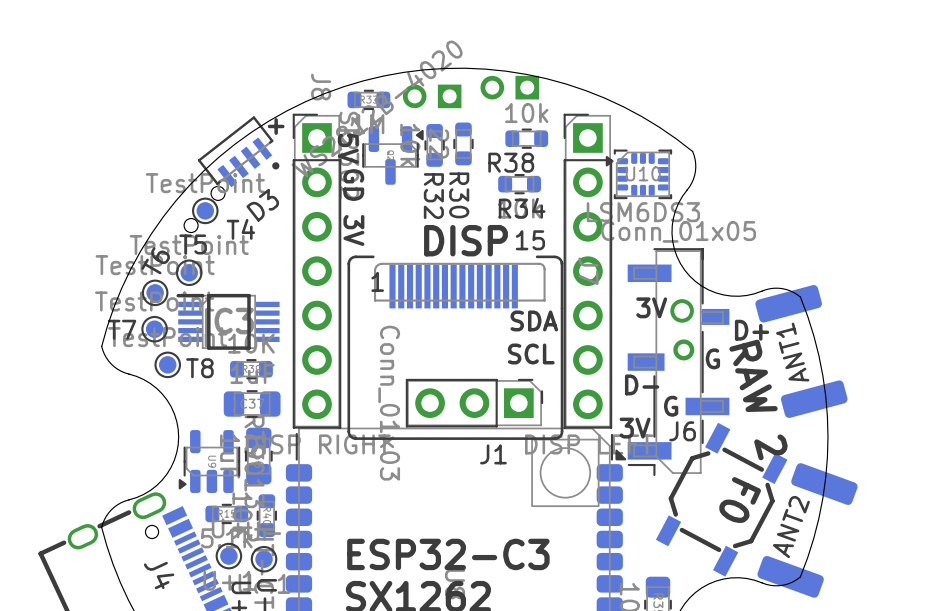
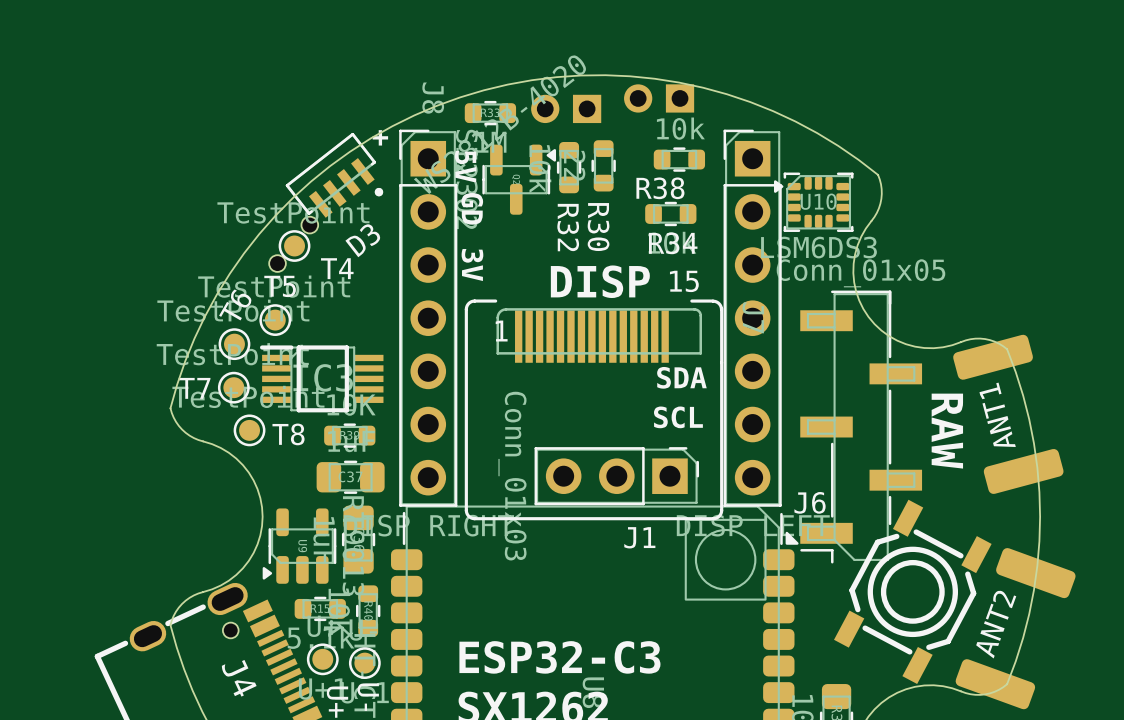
J6 footprint: [627, 248, 730, 477] -> [800, 290, 923, 564]
text: 3V (651, 307) -> none
part: (682, 329) -> none
text: D+ (752, 330) -> none
text: G (712, 358) -> none
text: D- (642, 384) -> none
text: RAW 2 (758, 399) -> RAW (947, 431)
text: G (671, 406) -> none
part footprint: [655, 422, 788, 577] -> [834, 499, 992, 685]
text: 3V (635, 428) -> none
J6 name position: J6 (682, 431) -> J6 (810, 502)
text: F0 (740, 500) -> none

